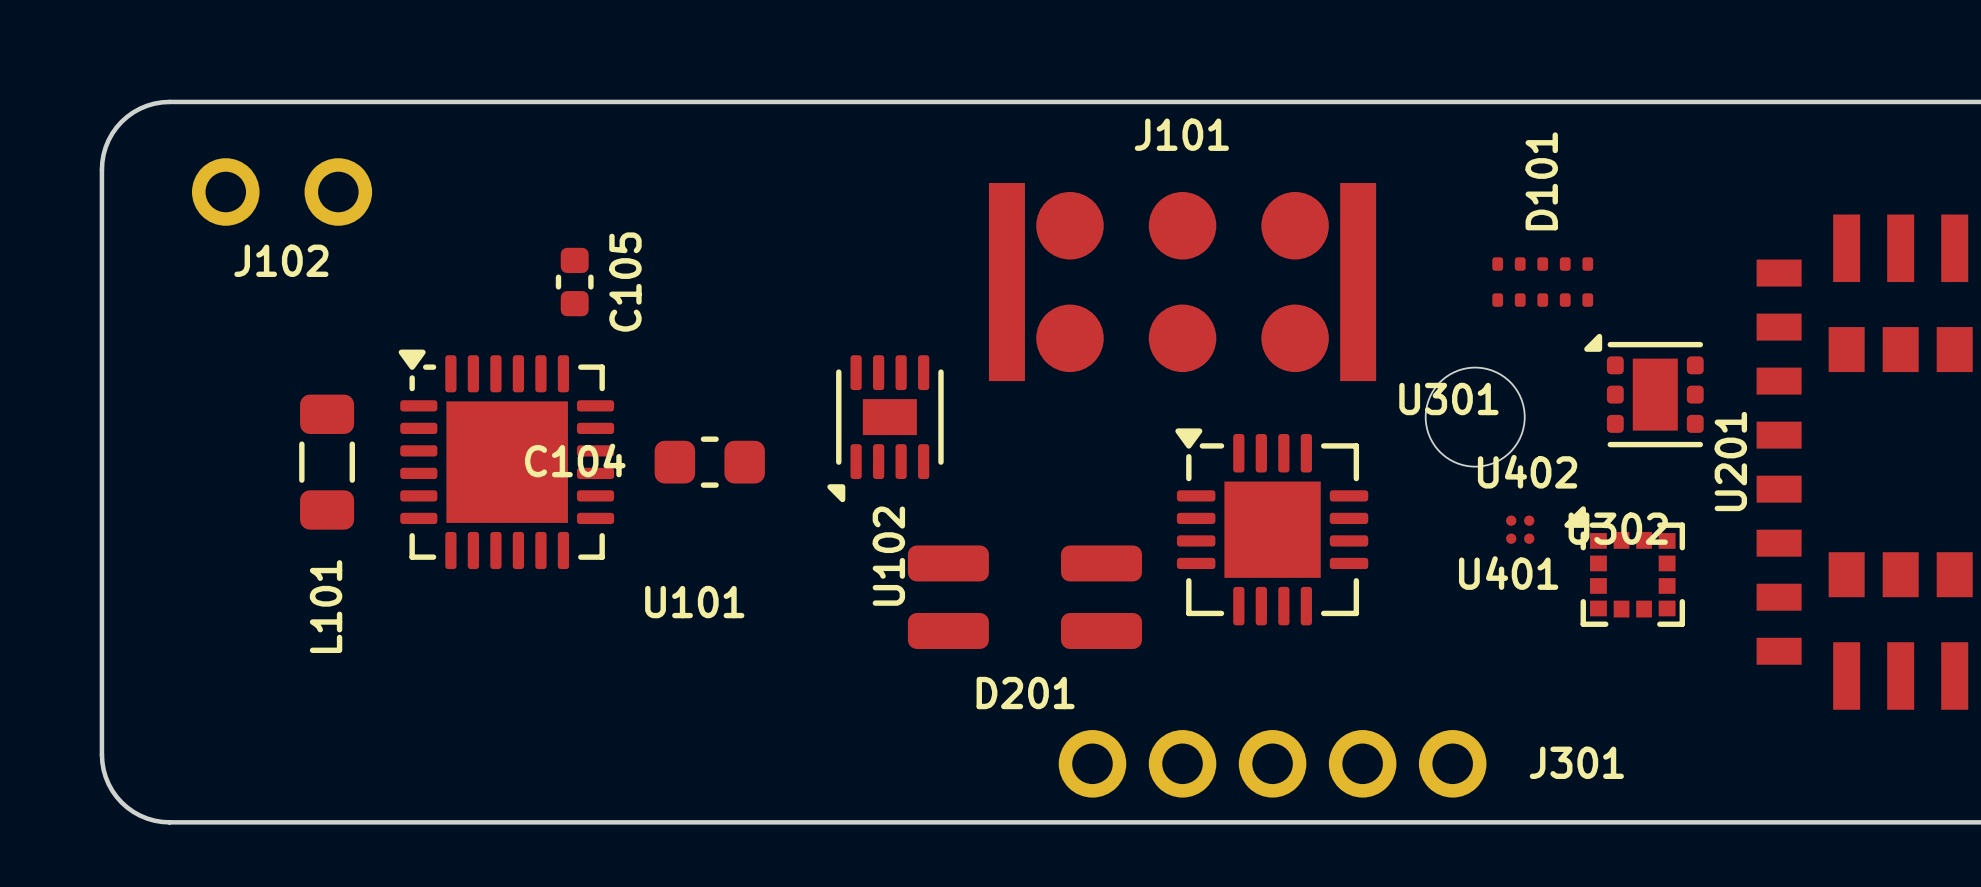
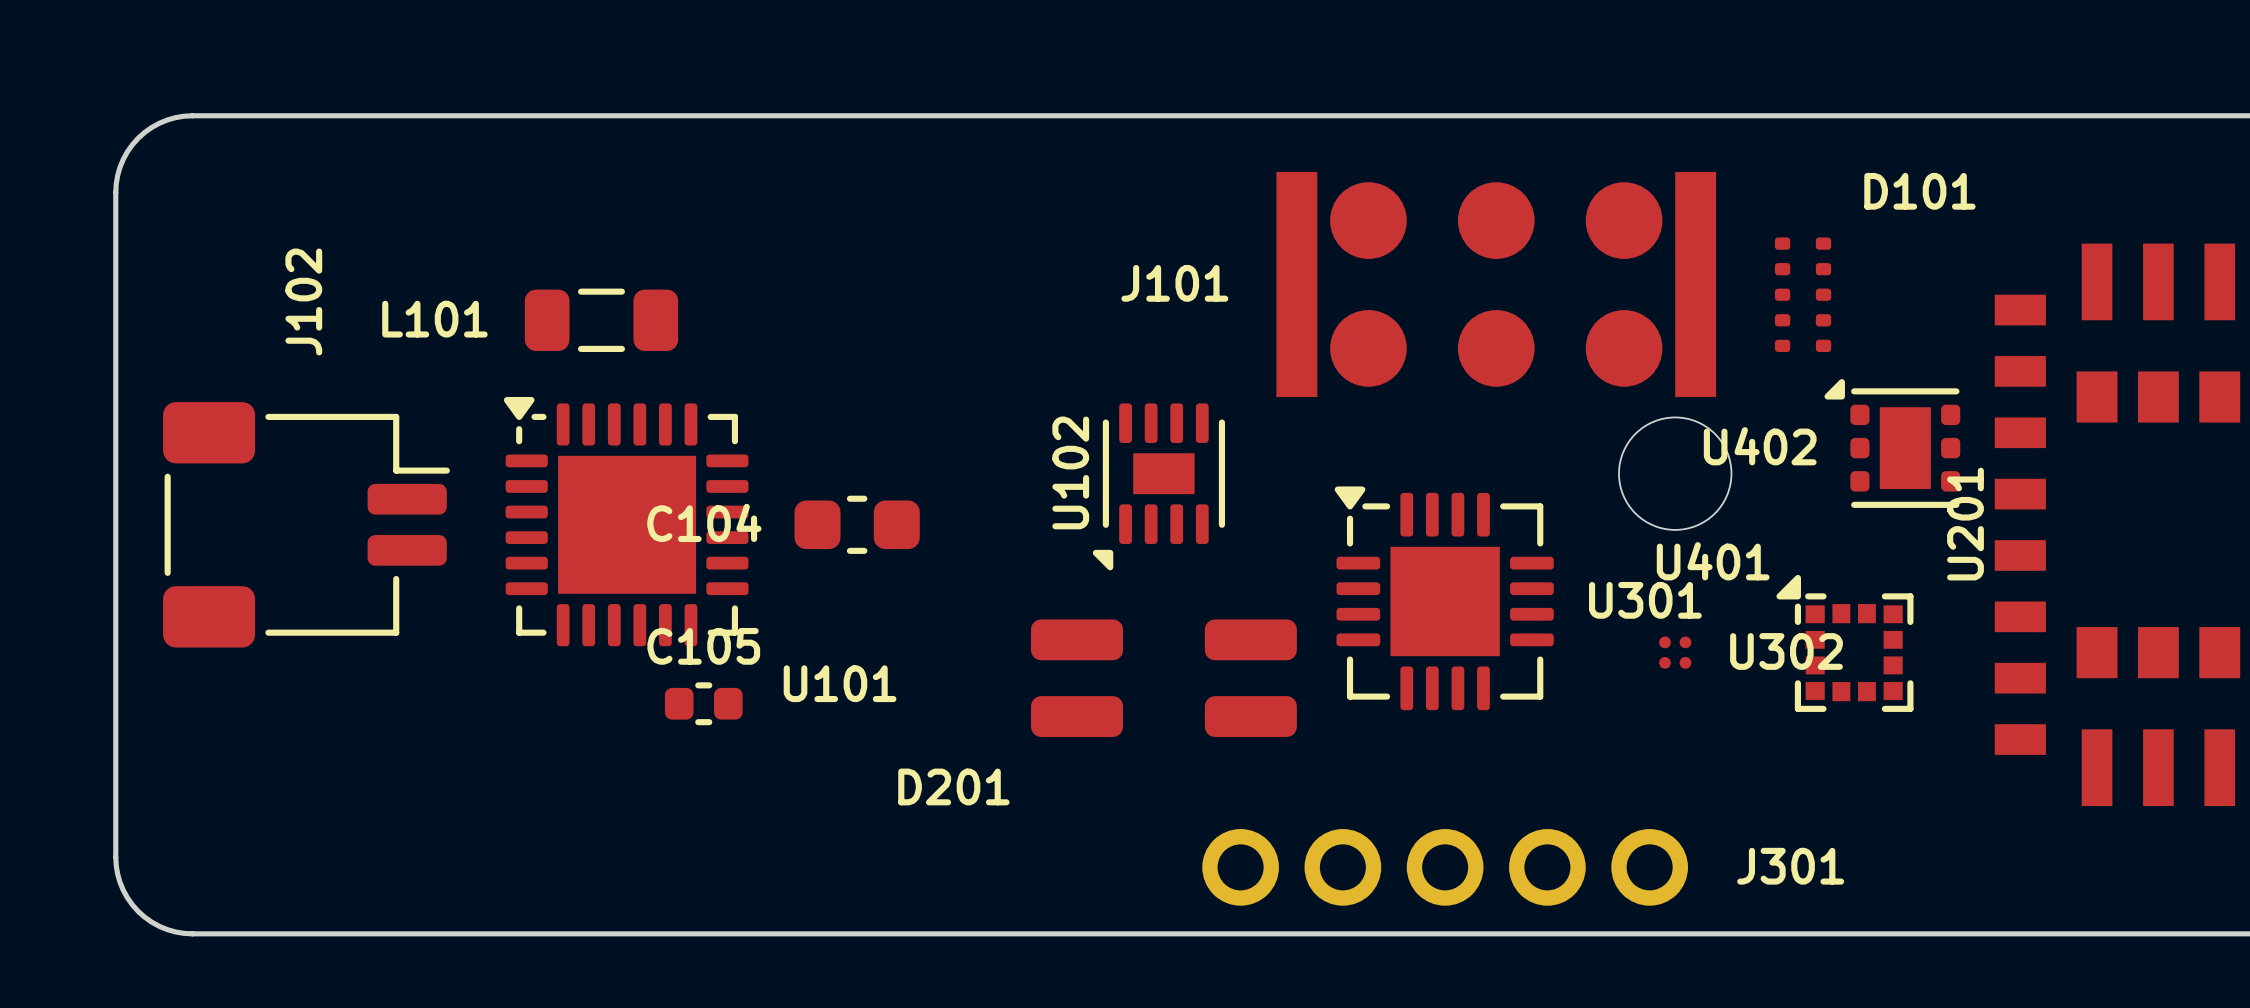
J101 name position: J101 (1181, 134) -> J101 (1174, 283)
J102 footprint: [191, 158, 373, 226] -> [163, 402, 450, 648]
D101 name position: D101 (1541, 181) -> D101 (1919, 191)
J102 name position: J102 (281, 260) -> J102 (303, 301)
C105 rotation: 0° (574, 282) -> 90° clockwise (703, 703)
C105 position: (574, 282) -> (703, 703)
J101 position: (1182, 282) -> (1496, 284)
D101 rotation: 0° (1542, 282) -> 90° clockwise (1803, 294)
U402 position: (1643, 390) -> (1892, 443)
U301 name position: U301 (1448, 399) -> U301 (1645, 600)
U102 position: (885, 428) -> (1158, 486)
U101 position: (506, 459) -> (626, 521)
L101 rotation: 0° (327, 462) -> 90° clockwise (601, 320)
L101 position: (327, 462) -> (601, 320)
C104 position: (709, 462) -> (857, 524)
U402 name position: U402 (1527, 471) -> U402 (1760, 446)
U302 position: (1520, 529) -> (1675, 652)
U102 name position: U102 (888, 556) -> U102 (1070, 472)
U401 name position: U401 (1508, 573) -> U401 (1713, 561)
D201 name position: D201 (1025, 693) -> D201 (953, 786)

